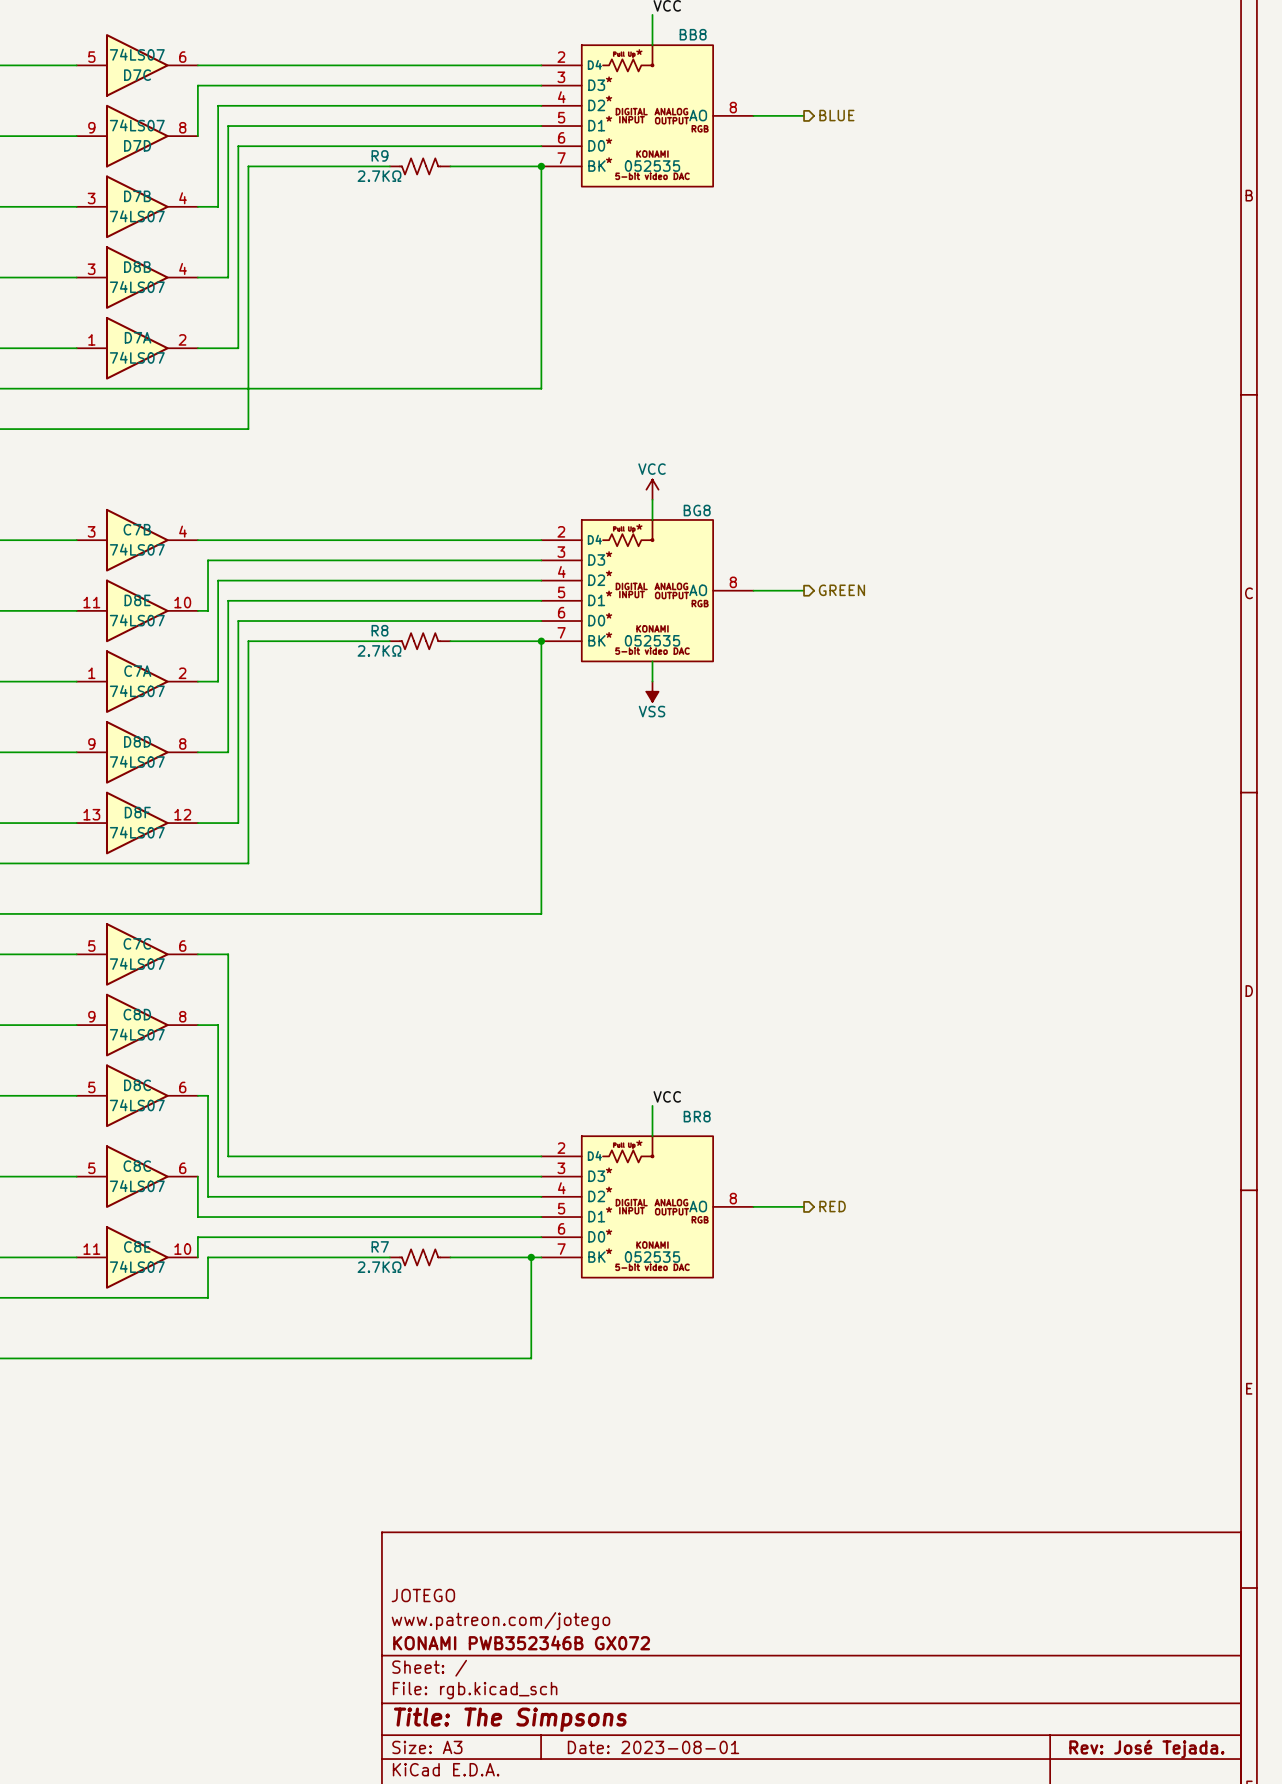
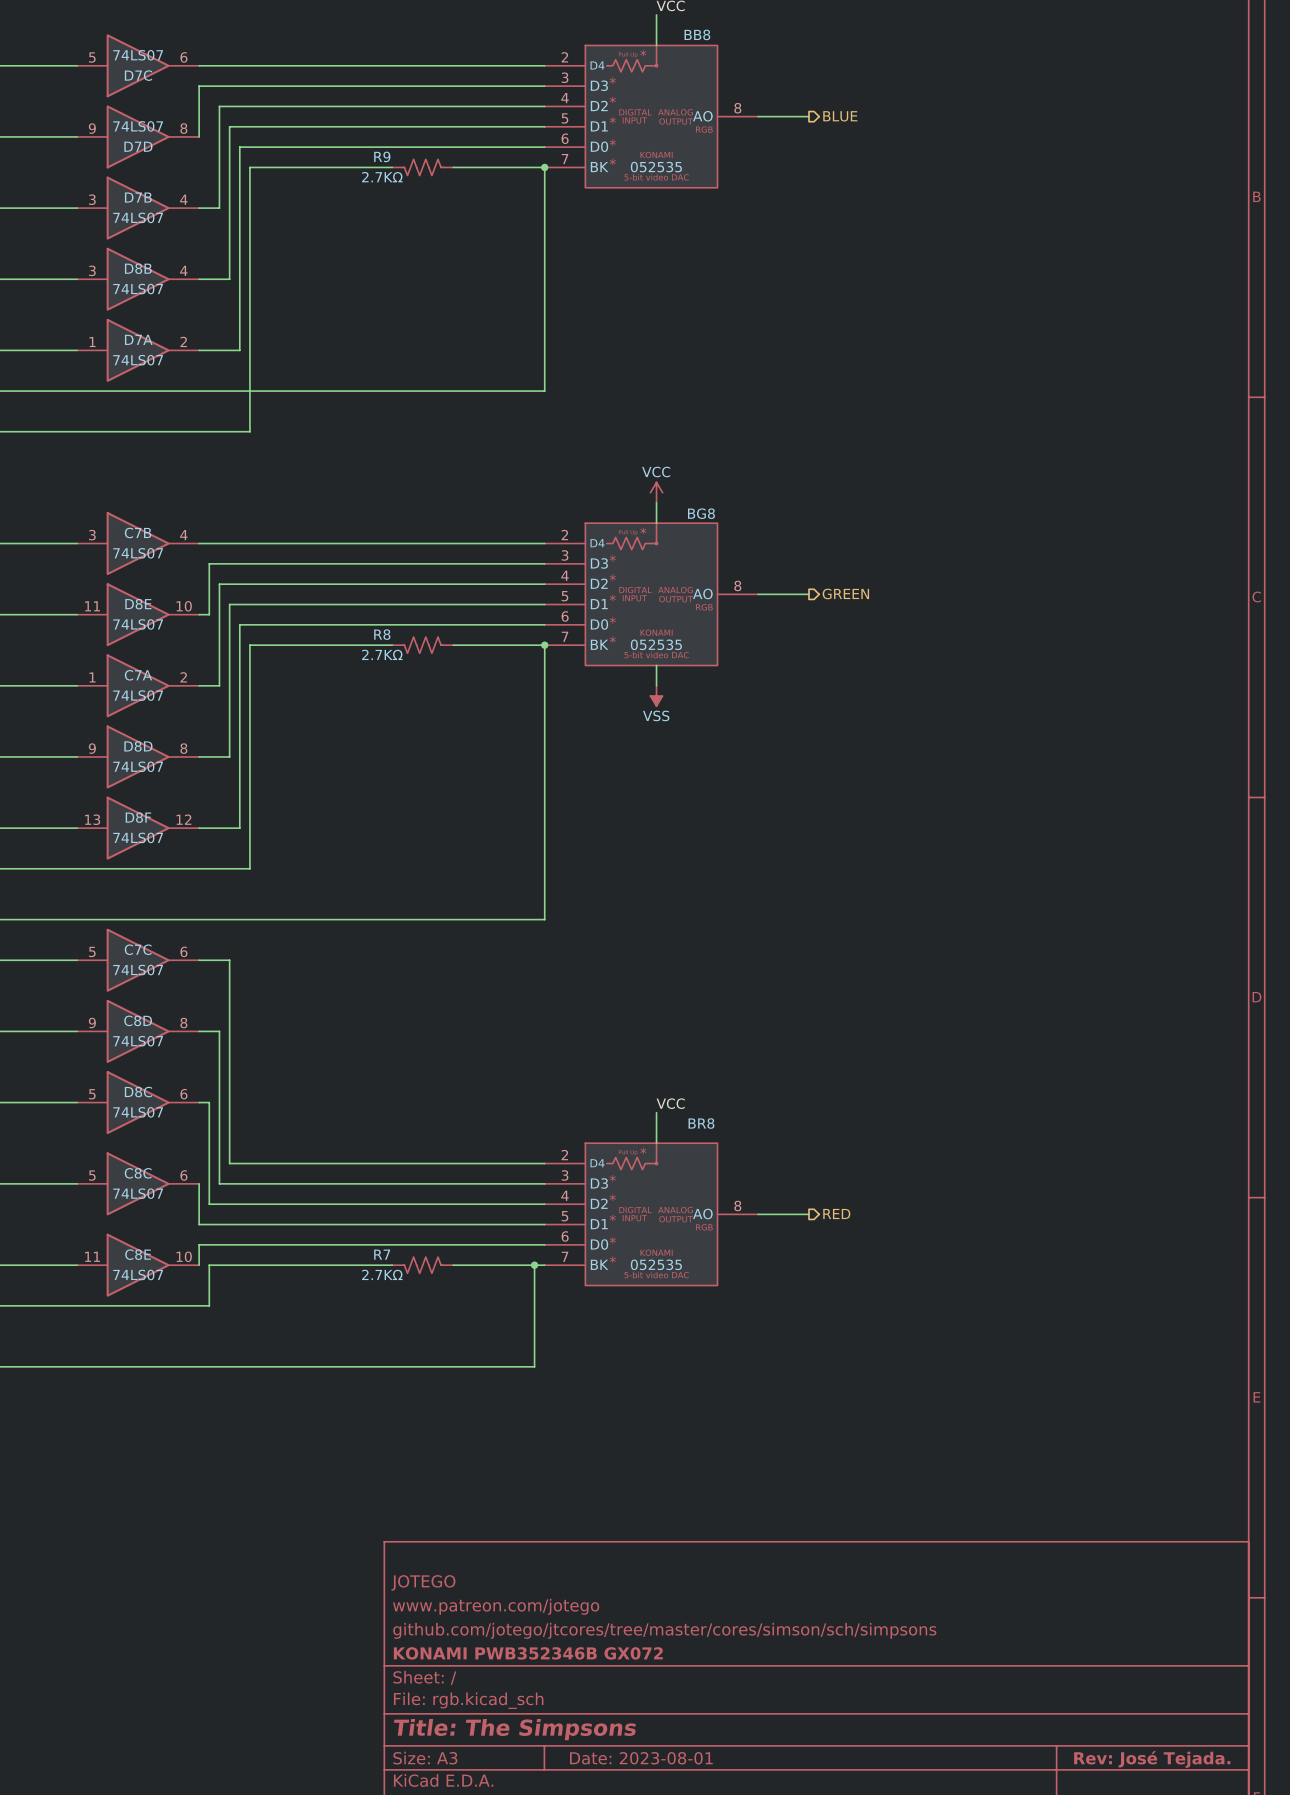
title block: none -> JOTEGO (423, 1582)
title block: JOTEGO (423, 1595) -> www.patreon.com/jotego (496, 1606)
title block: www.patreon.com/jotego (500, 1621) -> github.com/jotego/jtcores/tree/master/cores/simson/sch/simpsons (664, 1630)

